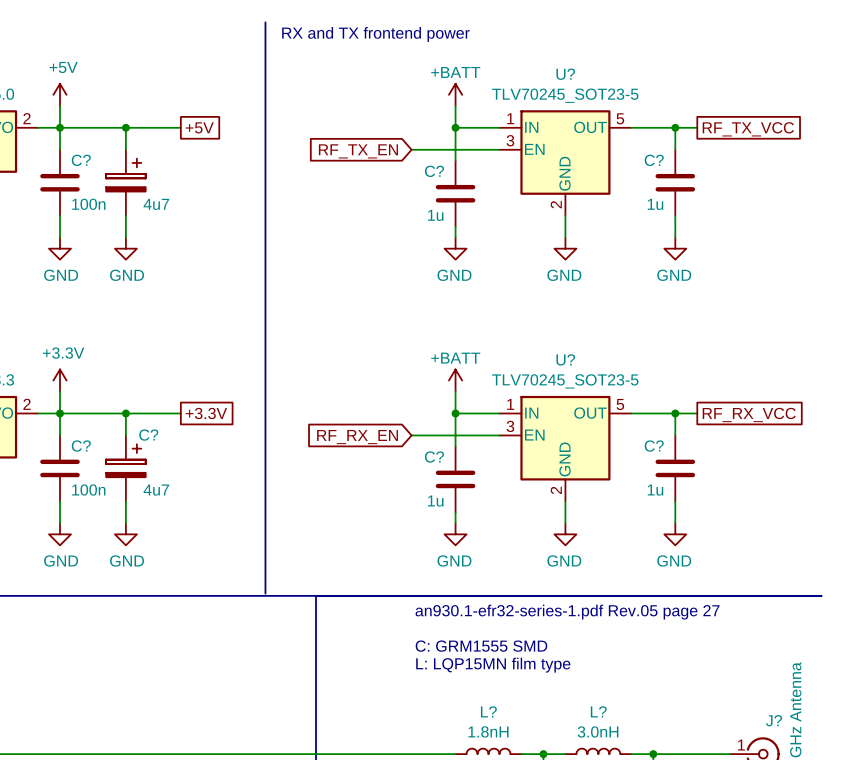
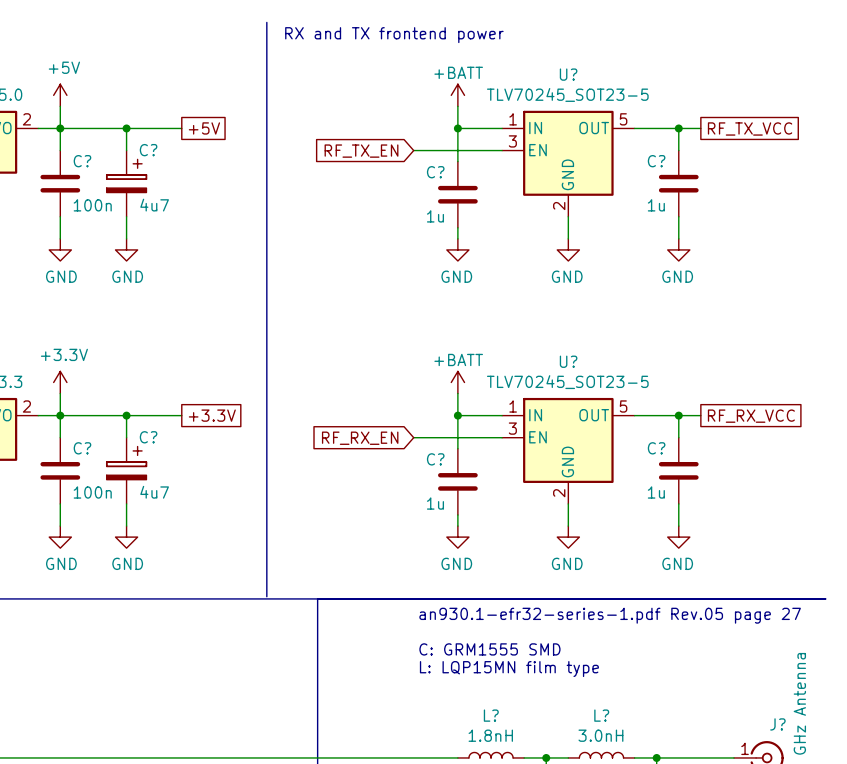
C? name: none -> C? (148, 150)

